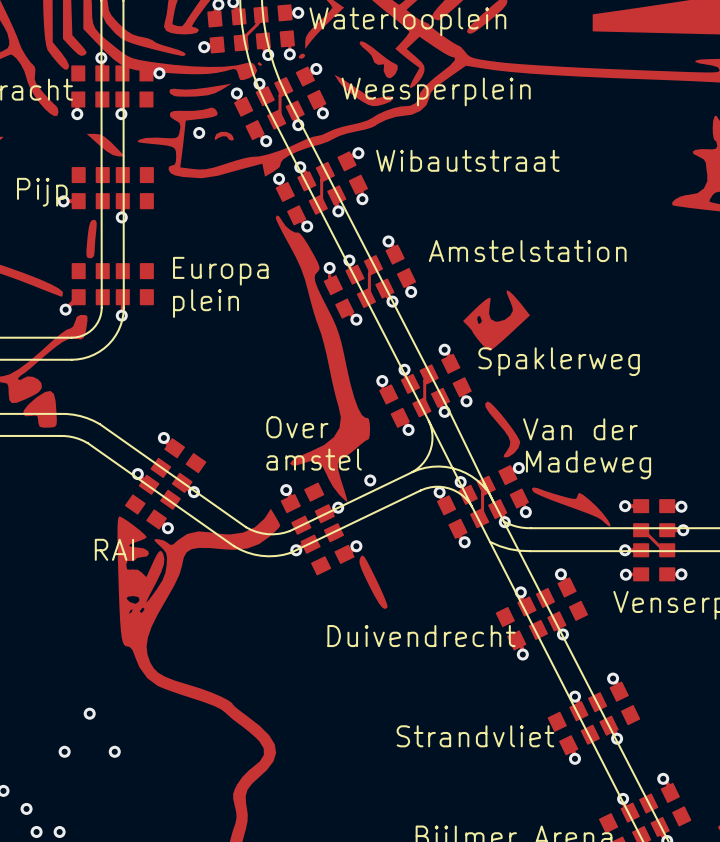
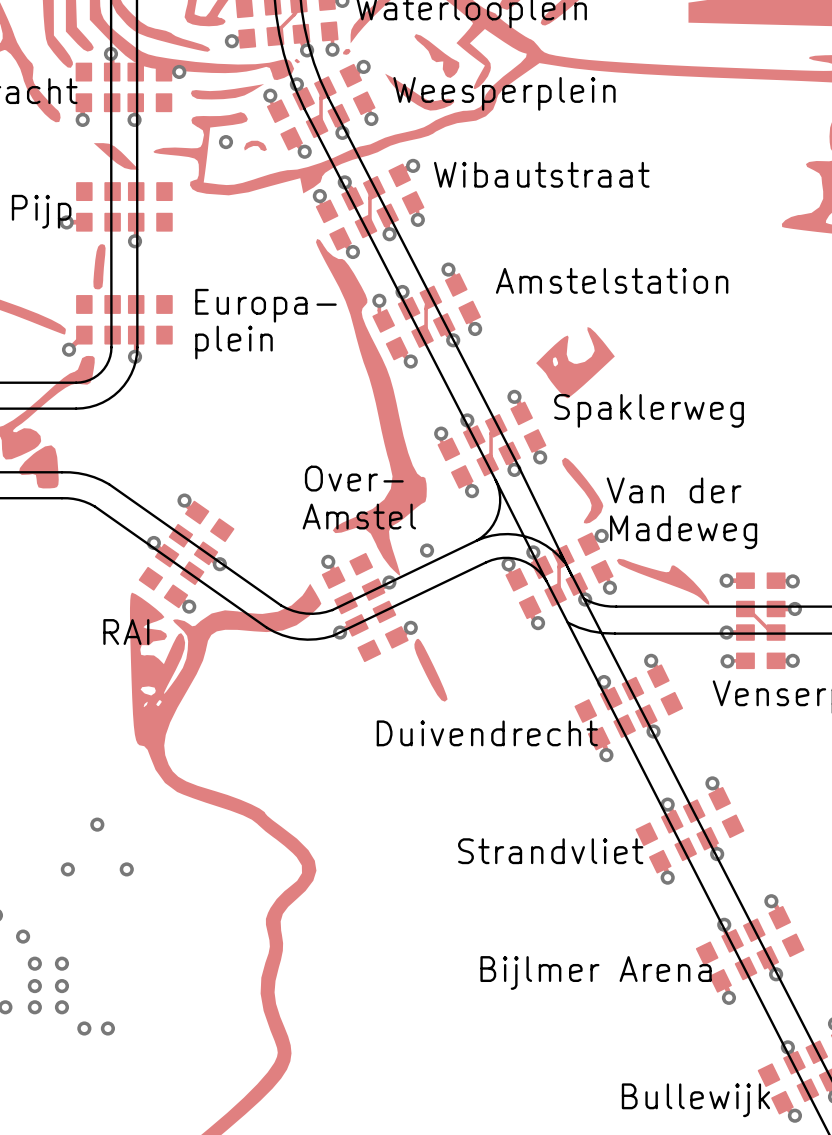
text: Europa (220, 271) -> Europa- (265, 305)
text: Over (297, 427) -> Over- (354, 478)
text: amstel (314, 459) -> Amstel (359, 516)

